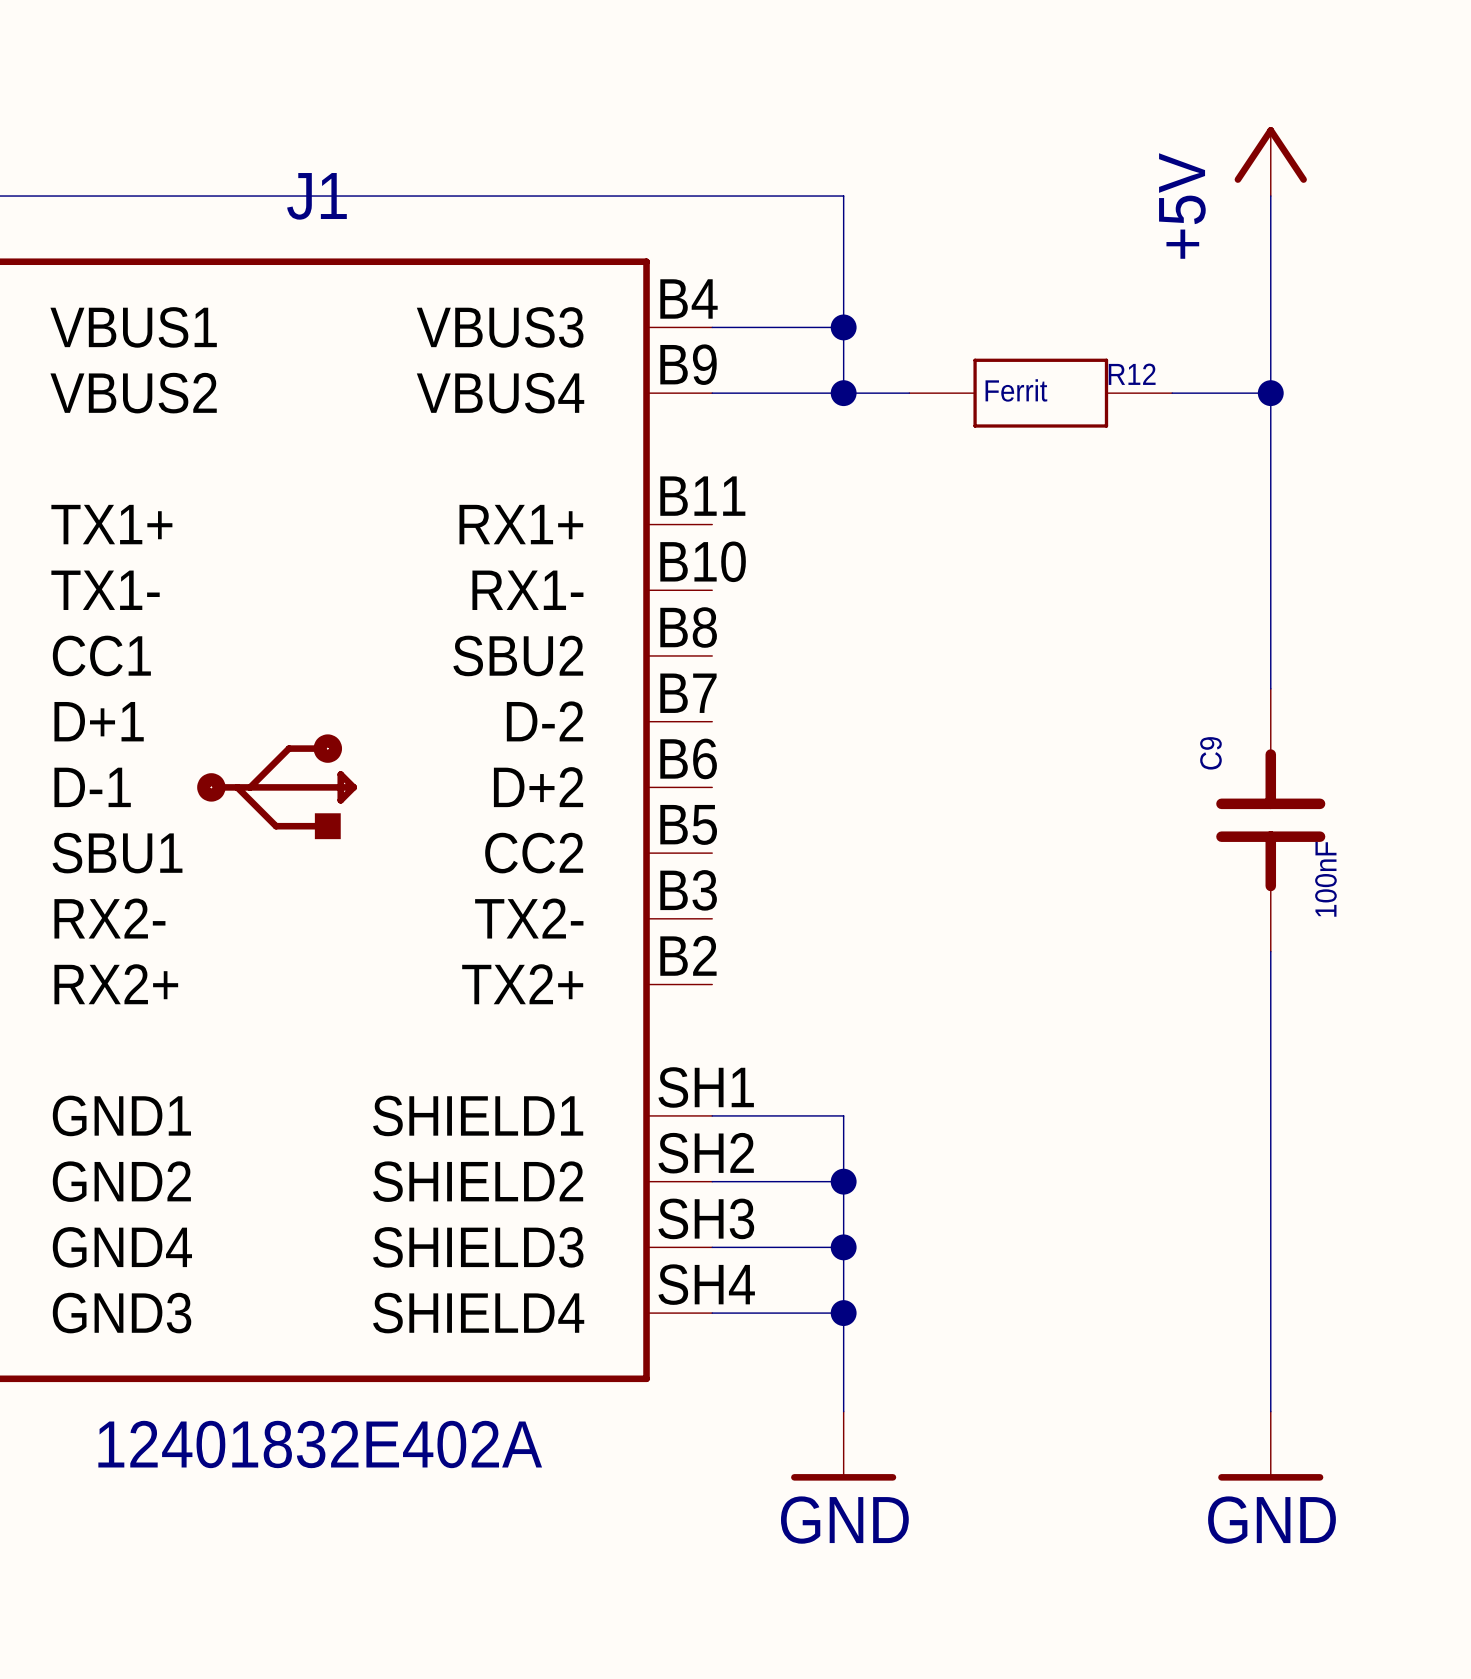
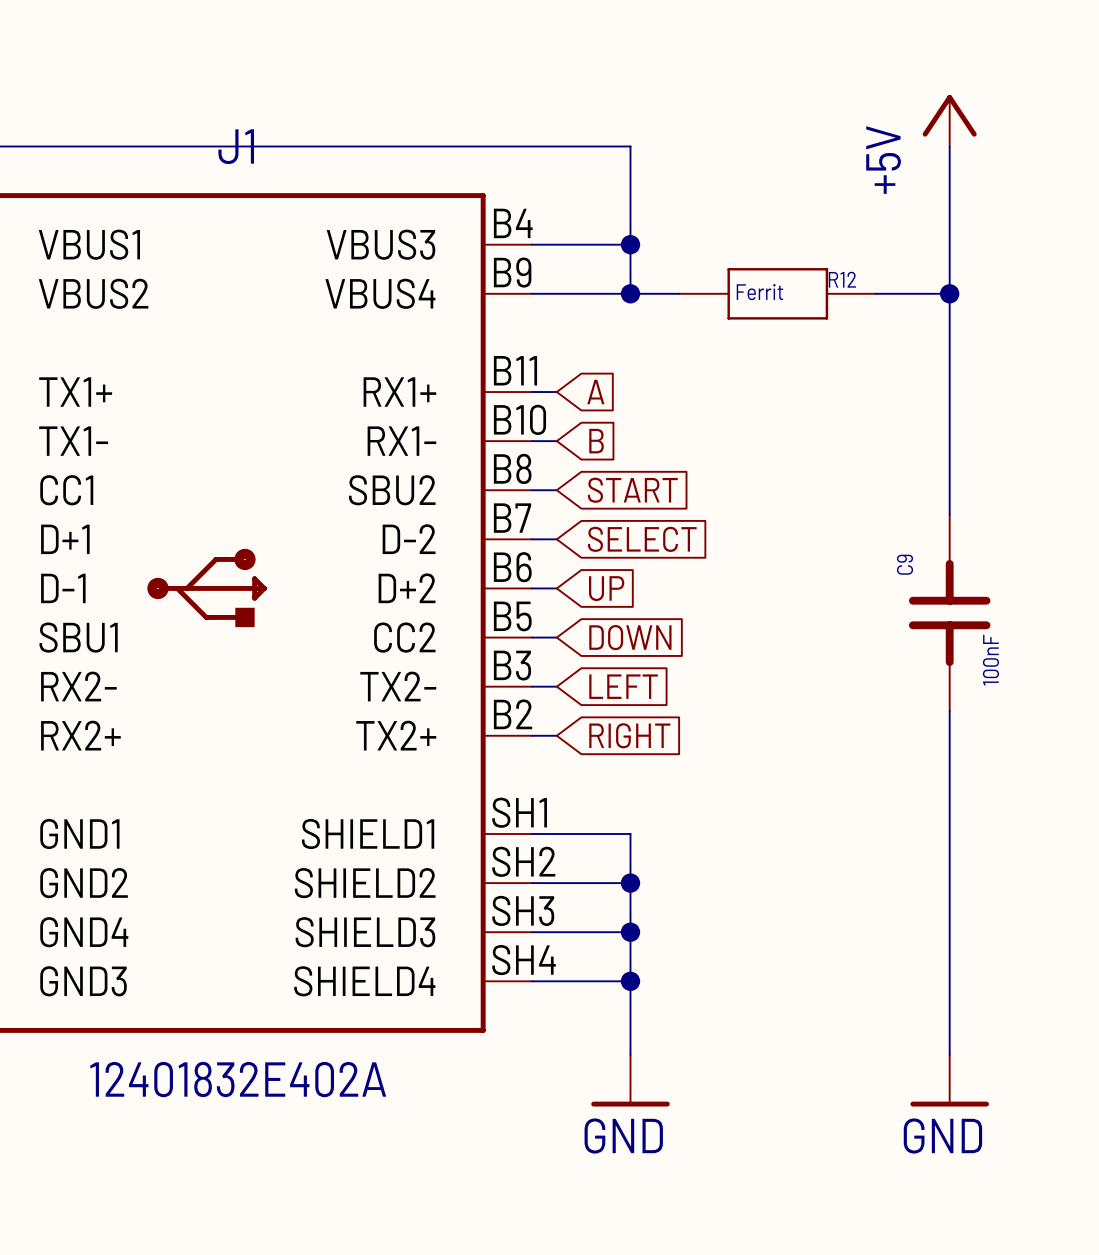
wire: none -> (532, 392) (556, 392)
global label: none -> A (595, 392)
wire: none -> (532, 441) (556, 441)
global label: none -> B (596, 441)
wire: none -> (532, 490) (556, 490)
global label: none -> START (632, 490)
wire: none -> (532, 539) (556, 539)
global label: none -> SELECT (642, 539)
wire: none -> (532, 588) (556, 588)
global label: none -> UP (606, 588)
wire: none -> (532, 637) (556, 637)
global label: none -> DOWN (630, 637)
wire: none -> (532, 686) (556, 686)
global label: none -> LEFT (623, 686)
wire: none -> (532, 735) (556, 735)
global label: none -> RIGHT (629, 735)

